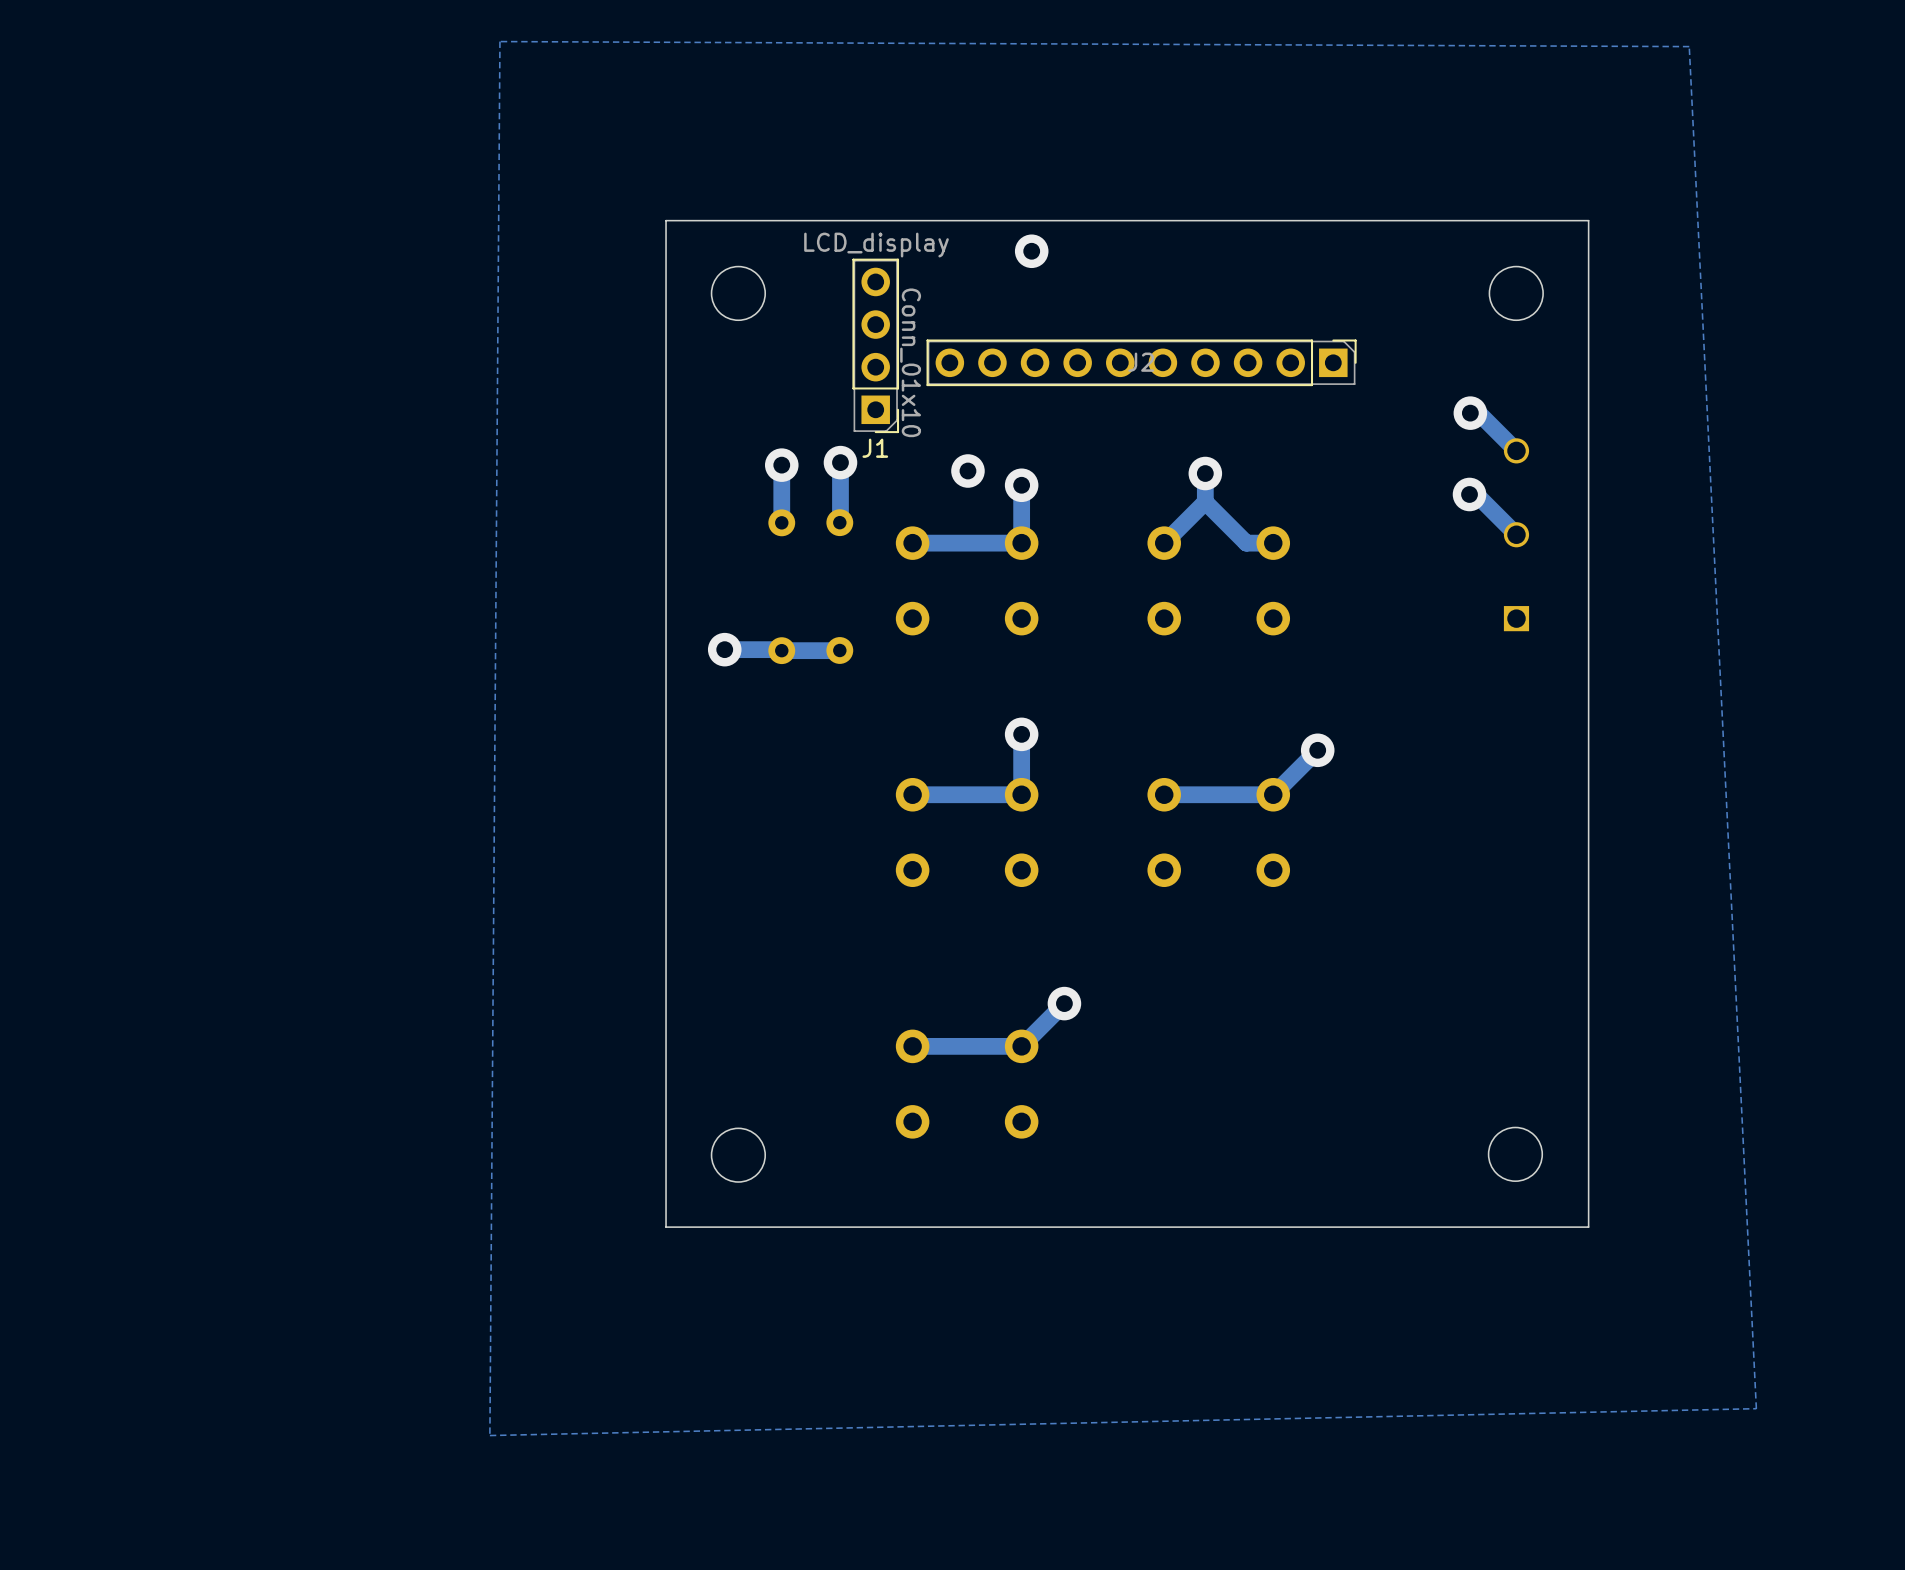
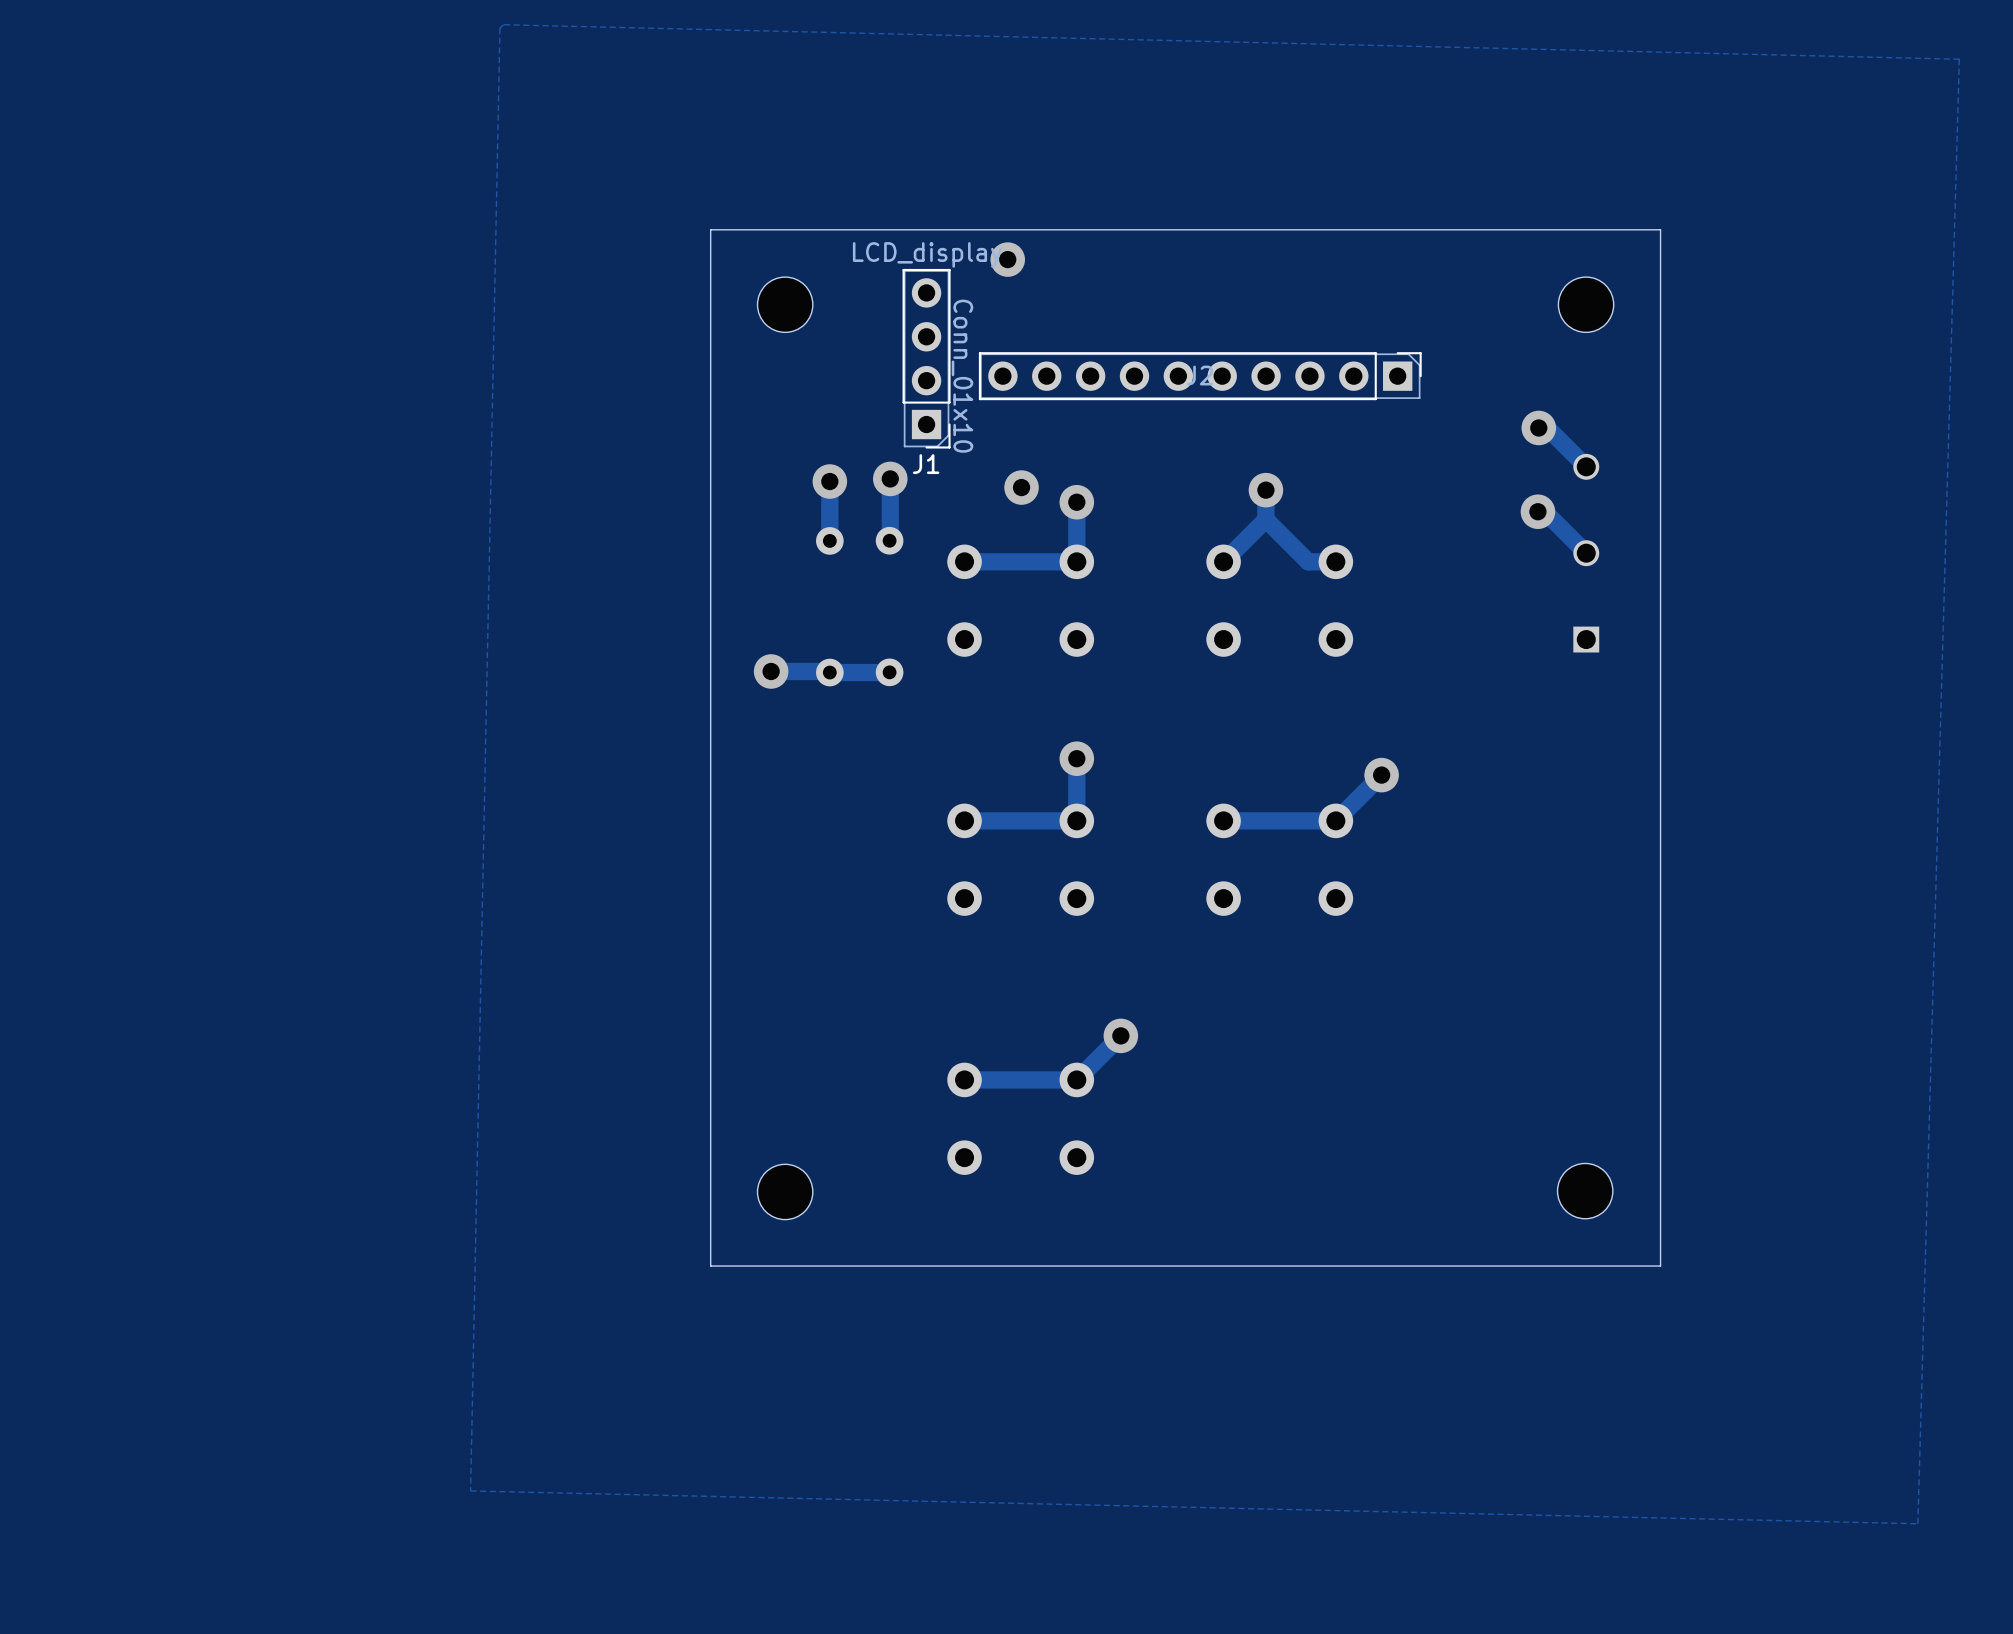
zone outline: (499, 41) (1689, 46) (1756, 1408) (489, 1435) (499, 41) -> (503, 24) (1959, 59) (1917, 1523) (470, 1490) (499, 28) (503, 24)
via position: (1031, 251) -> (1007, 259)

